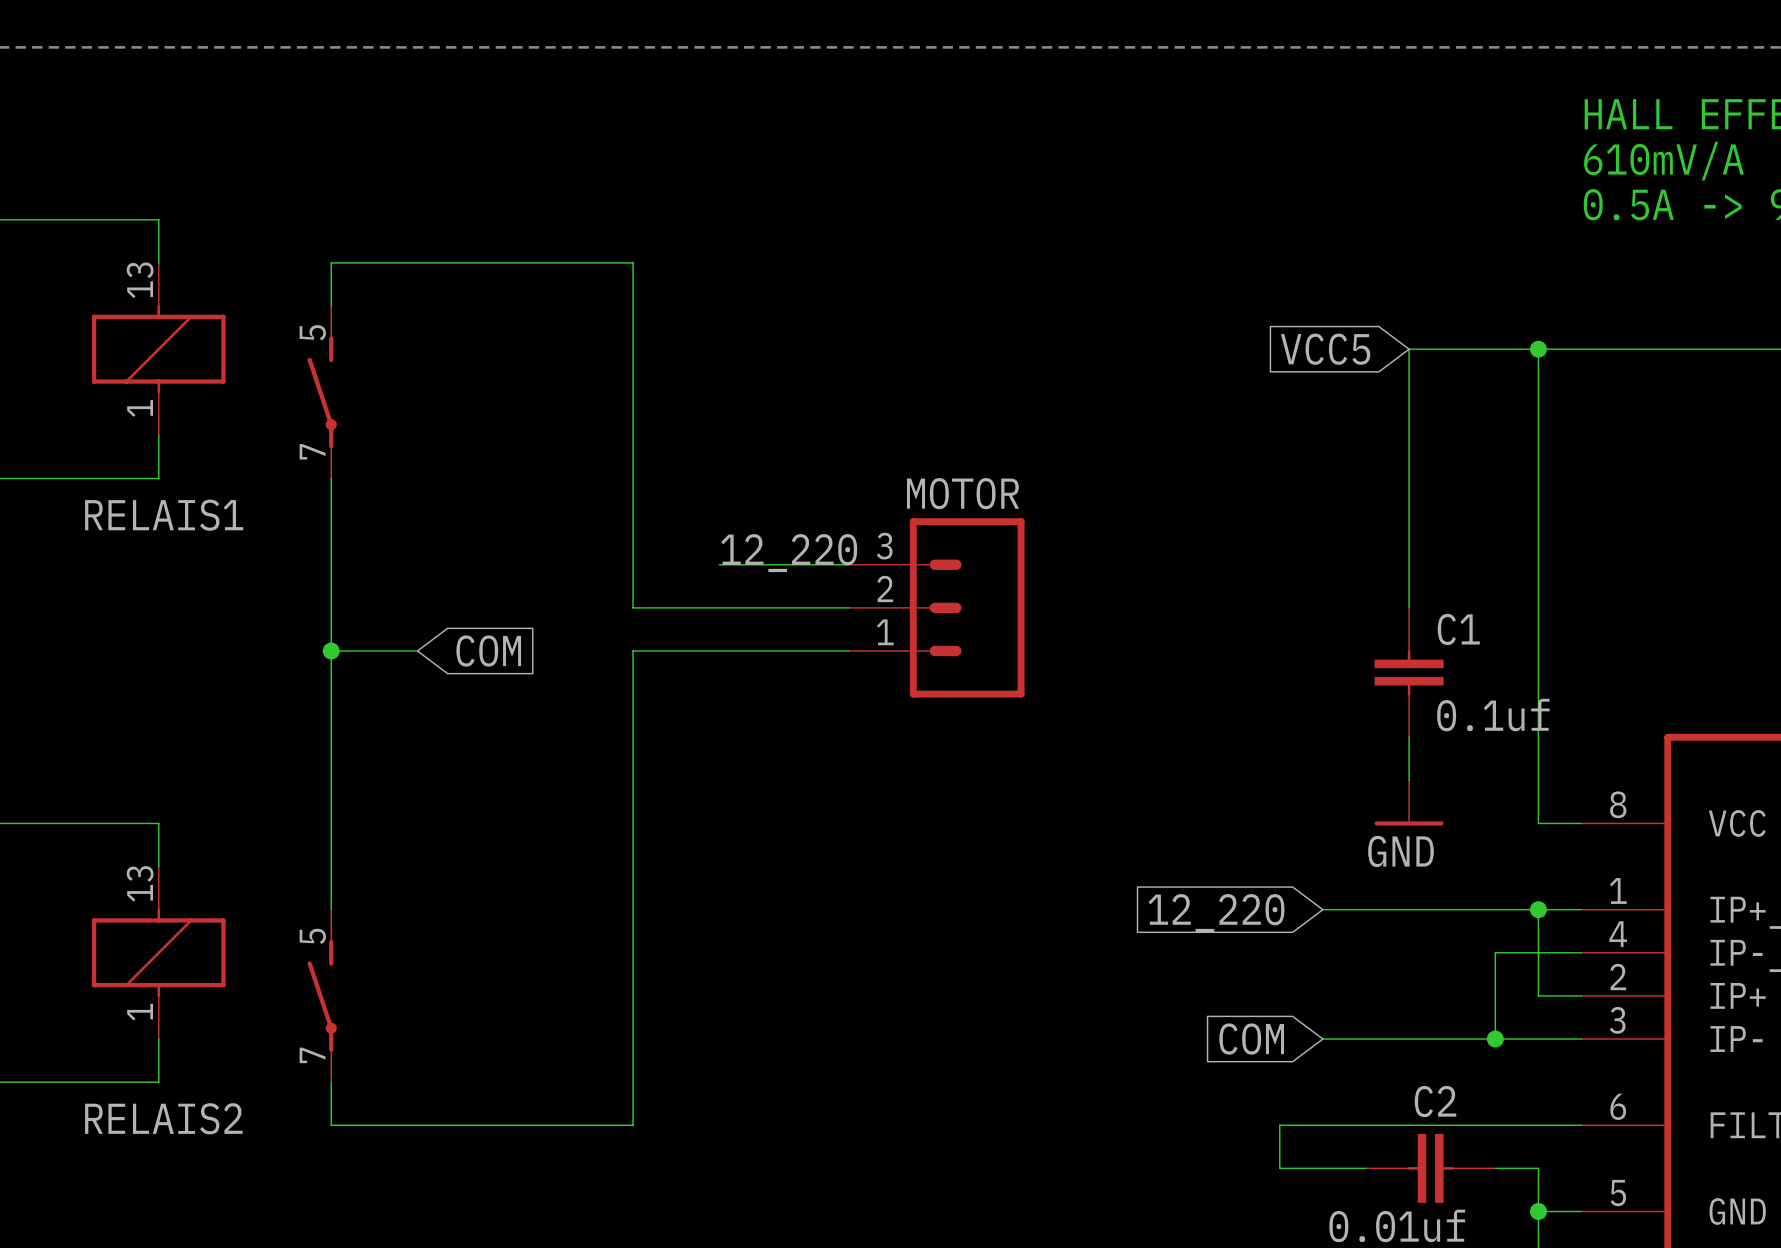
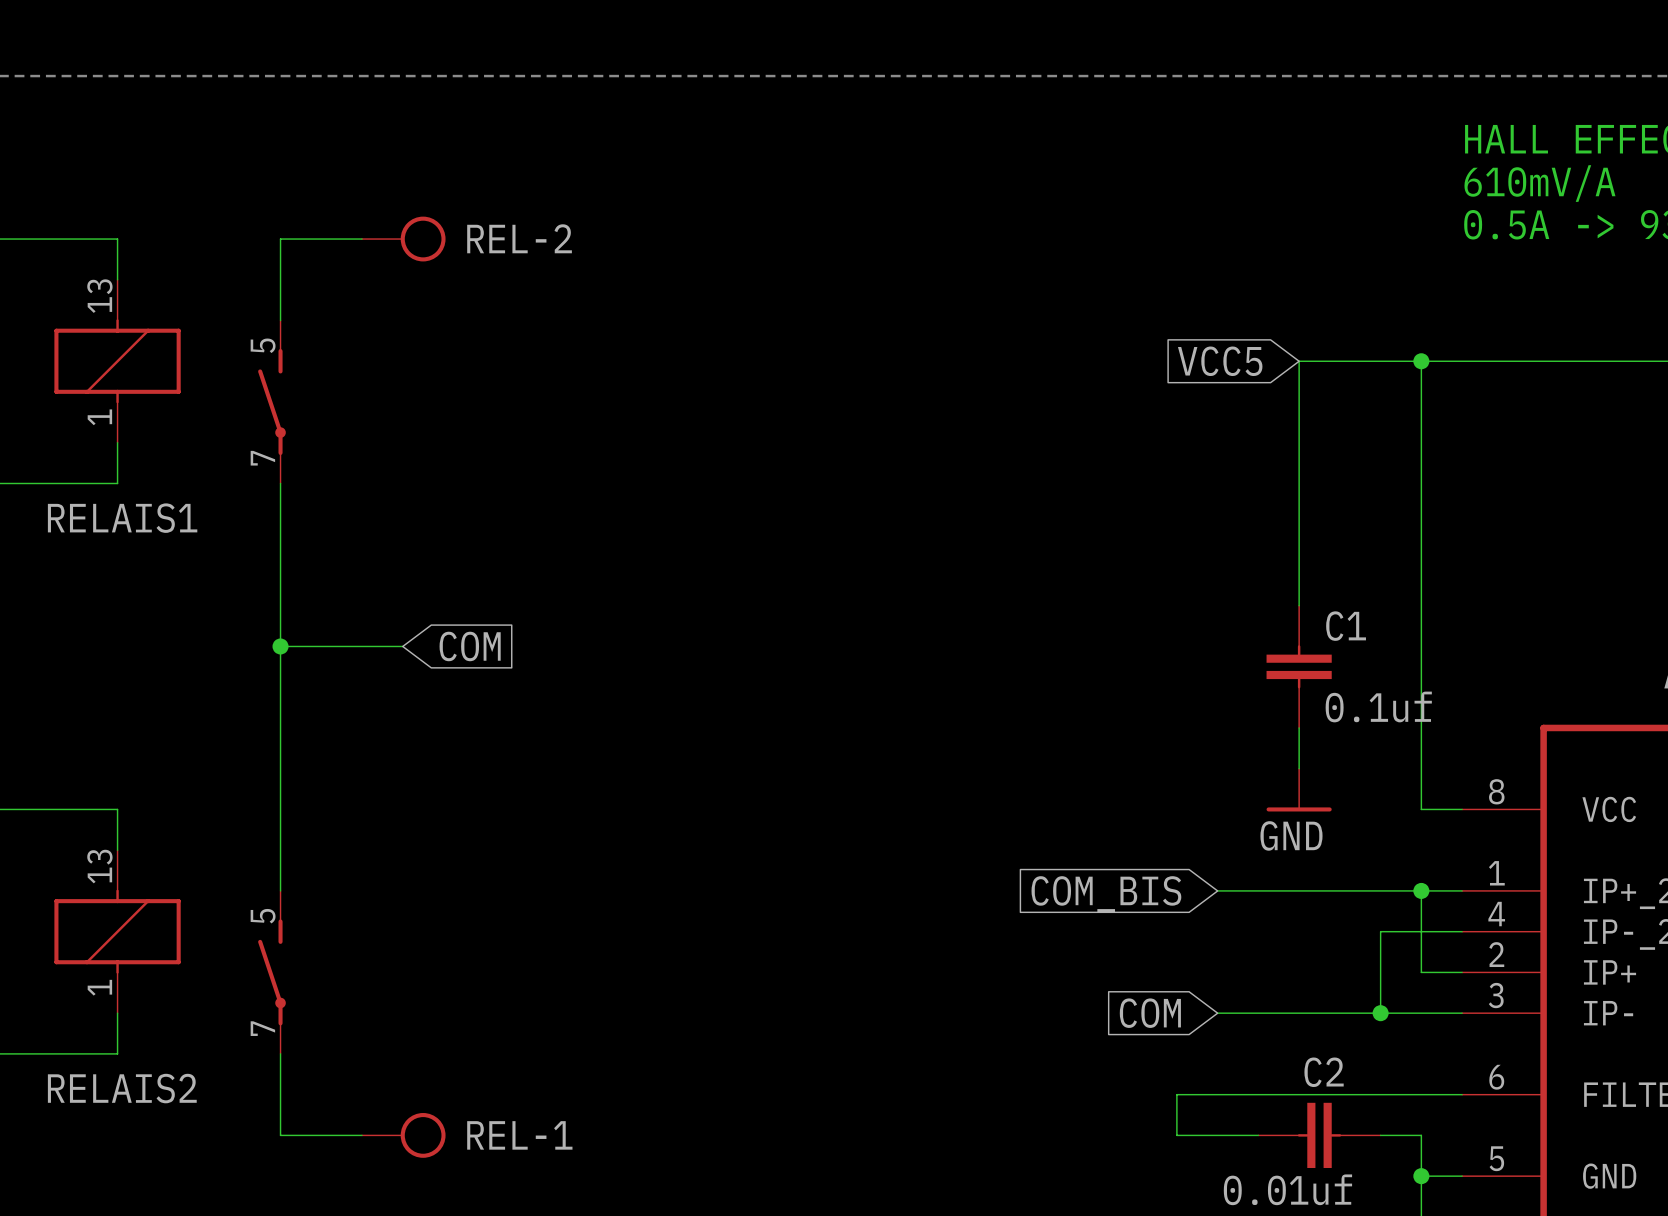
REL-2: none -> (403, 239)
wire: (331, 262) (633, 262) (633, 607) (848, 607) -> (280, 279) (280, 239) (362, 239)
label: 12_220 (789, 553) -> none
wire: (719, 564) (848, 564) -> none
MOTOR: (936, 607) -> none
wire: none -> (362, 646) (402, 646)
global label position: COM (488, 651) -> COM (470, 646)
wire: (848, 651) (633, 651) (633, 1125) (331, 1125) -> (362, 1135) (280, 1135) (280, 1094)
global label: 12_220 (1216, 913) -> COM_BIS (1106, 894)
REL-1: none -> (403, 1135)

